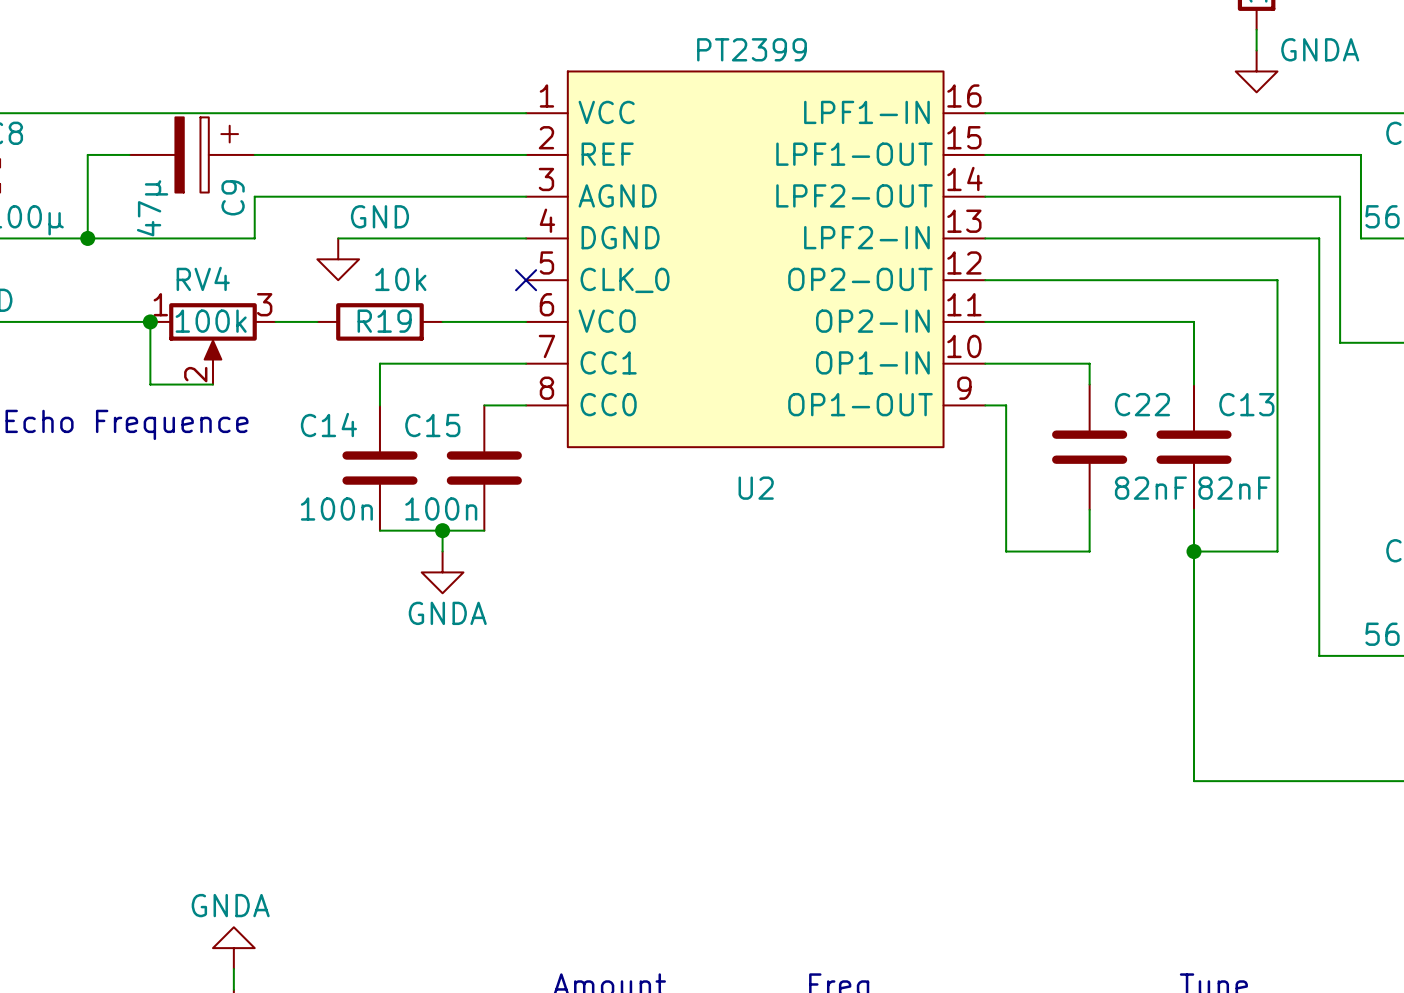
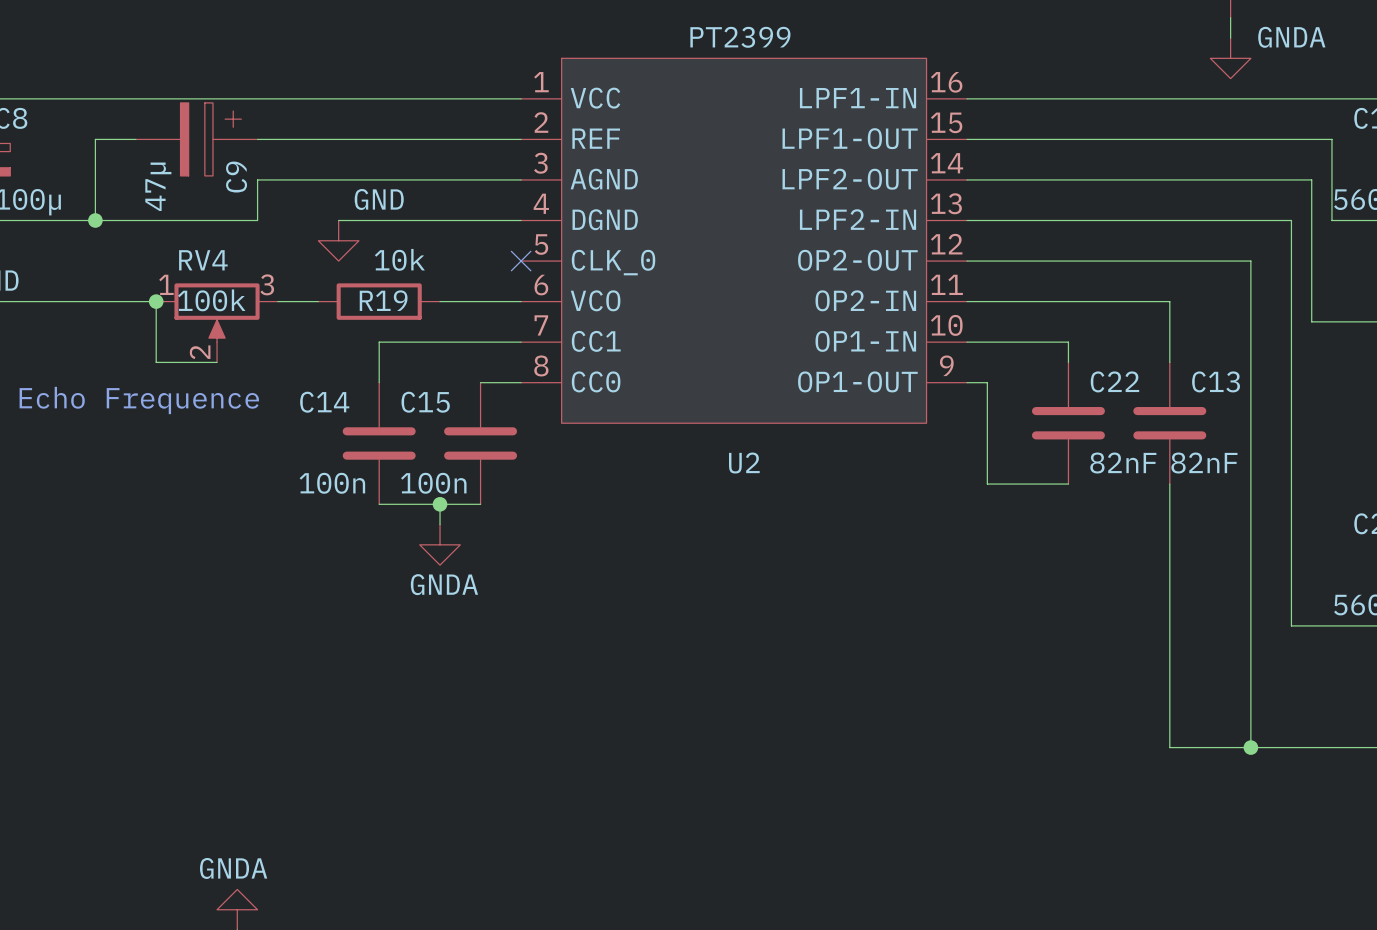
wire: (1006, 509) (1006, 551) (1089, 551) (1089, 509) -> (987, 484) (1068, 484)
wire: (1194, 551) (1277, 551) -> (1250, 747) (1250, 524)
junction: (1194, 551) -> none
junction: none -> (1250, 747)

